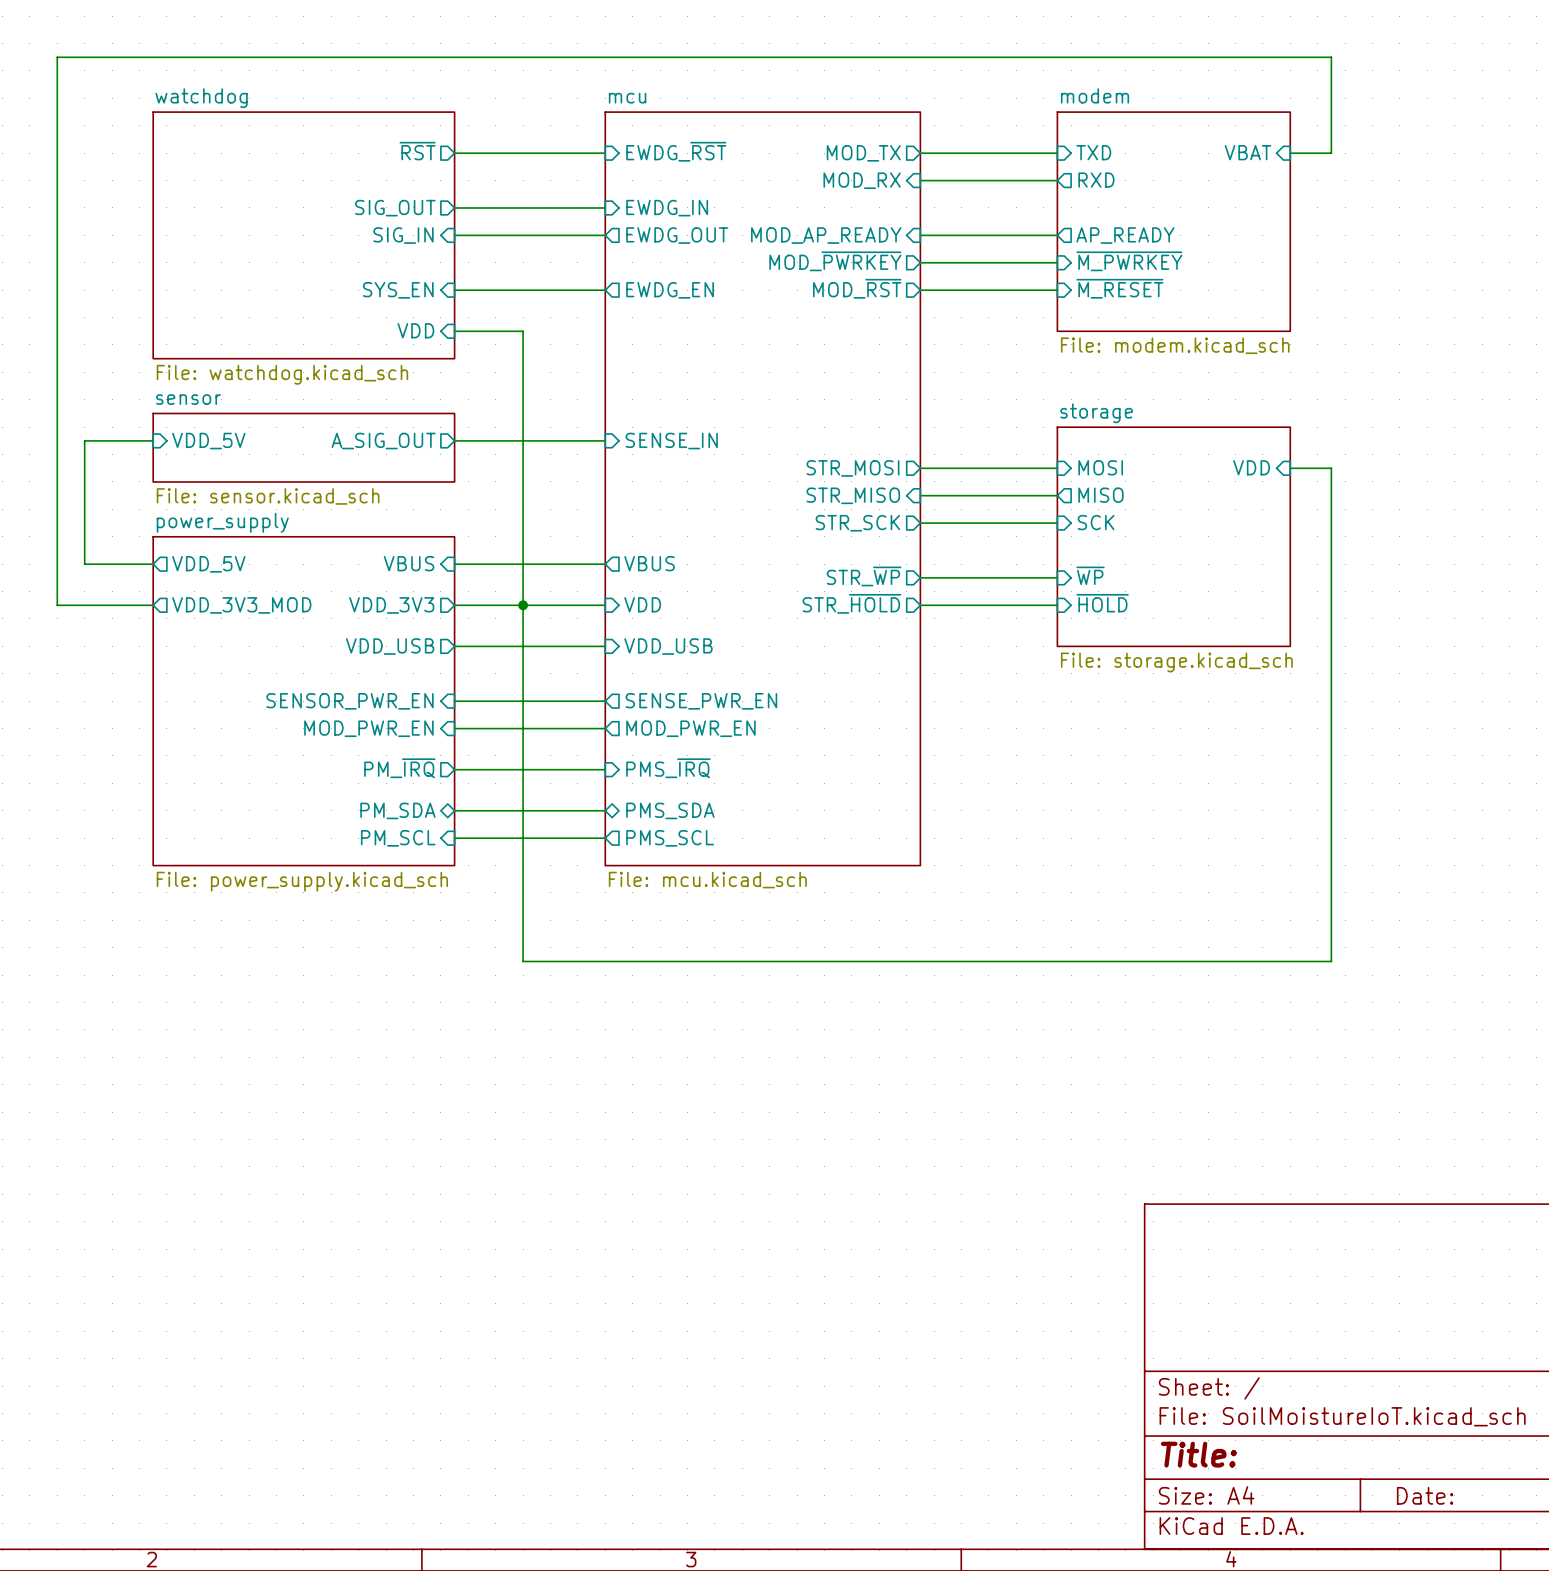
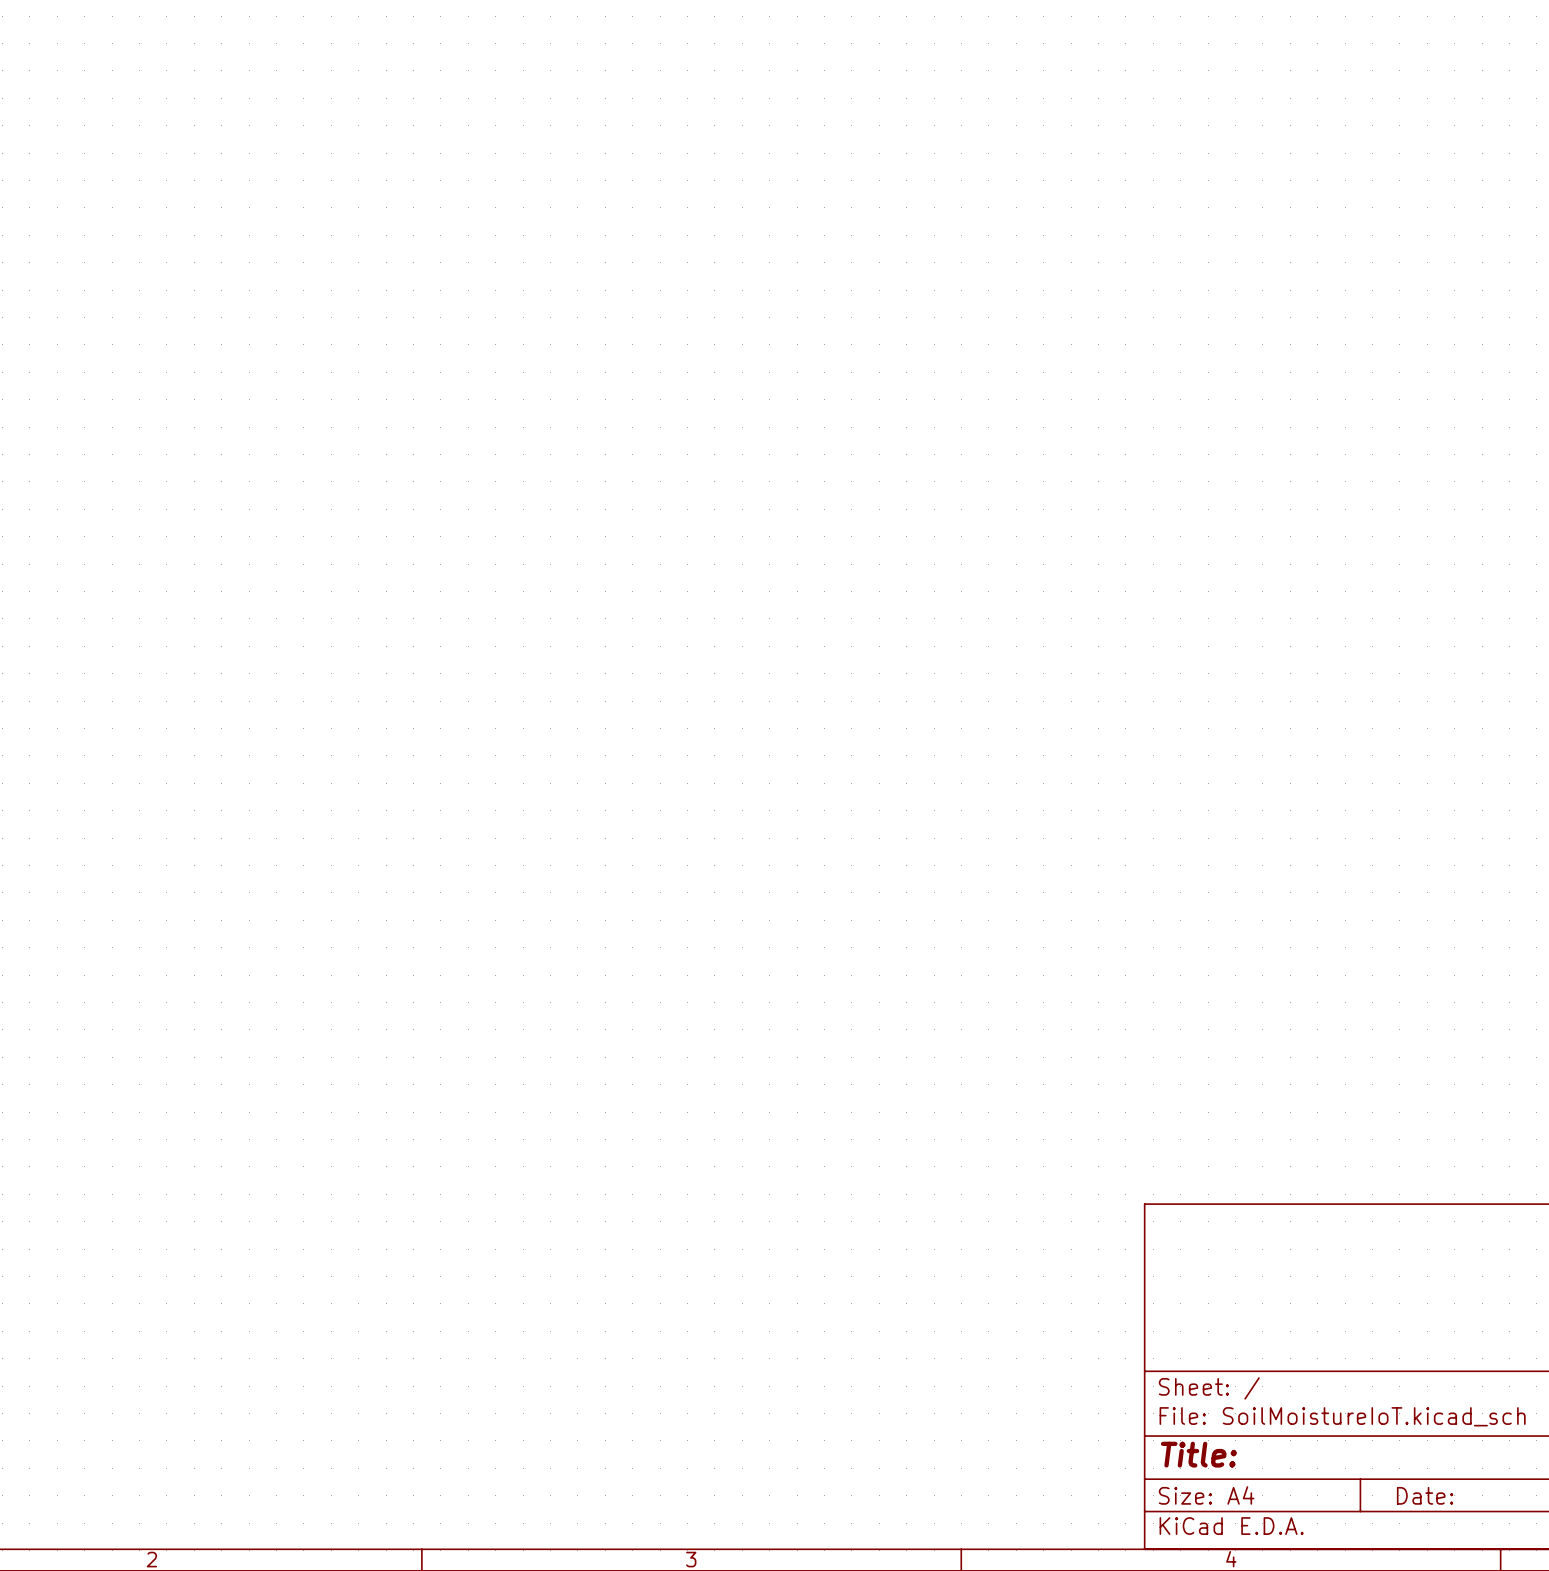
sheet pin: ~{RST} (417, 151) -> none
sheet pin: EWDG_~{RST} (676, 151) -> none
sheet pin: TXD (1093, 152) -> none
sheet pin: VBAT (1248, 152) -> none
wire: (454, 153) (605, 153) -> none
sheet pin: MOD_TX (863, 153) -> none
wire: (920, 153) (1057, 153) -> none
wire: (1290, 153) (1331, 153) (1331, 57) (57, 57) (57, 605) (153, 605) -> none
sheet pin: MOD_RX (862, 180) -> none
wire: (920, 180) (1057, 180) -> none
sheet pin: RXD (1096, 180) -> none
wire: (454, 207) (605, 207) -> none
sheet pin: SIG_OUT (395, 208) -> none
sheet pin: EWDG_IN (667, 208) -> none
sheet modem: File: modem.kicad_sch (1173, 221) -> none
sheet watchdog: File: watchdog.kicad_sch (303, 235) -> none
sheet pin: SIG_IN (403, 235) -> none
wire: (454, 235) (605, 235) -> none
sheet pin: EWDG_OUT (677, 235) -> none
sheet pin: MOD_AP_READY (826, 235) -> none
wire: (920, 235) (1057, 235) -> none
sheet pin: AP_READY (1125, 235) -> none
sheet pin: MOD_~{PWRKEY} (835, 261) -> none
sheet pin: ~{M_PWRKEY} (1129, 261) -> none
wire: (920, 262) (1057, 262) -> none
sheet pin: MOD_~{RST} (857, 288) -> none
sheet pin: ~{M_RESET} (1119, 288) -> none
sheet pin: SYS_EN (398, 290) -> none
wire: (454, 290) (605, 290) -> none
sheet pin: EWDG_EN (670, 290) -> none
wire: (920, 290) (1057, 290) -> none
sheet pin: VDD (415, 330) -> none
wire: (454, 331) (523, 331) (523, 961) (1331, 961) (1331, 468) (1290, 468) -> none
wire: (153, 440) (84, 440) (84, 564) (153, 564) -> none
wire: (454, 440) (605, 440) -> none
sheet pin: VDD_5V (208, 441) -> none
sheet pin: A_SIG_OUT (383, 441) -> none
sheet pin: SENSE_IN (671, 441) -> none
sheet sensor: File: sensor.kicad_sch (303, 447) -> none
sheet pin: MOSI (1100, 467) -> none
sheet pin: VDD (1251, 467) -> none
sheet pin: STR_MOSI (852, 468) -> none
wire: (920, 468) (1057, 468) -> none
sheet mcu: File: mcu.kicad_sch (762, 488) -> none
sheet pin: STR_MISO (853, 495) -> none
wire: (920, 495) (1057, 495) -> none
sheet pin: MISO (1100, 495) -> none
sheet pin: SCK (1096, 522) -> none
sheet pin: STR_SCK (857, 523) -> none
wire: (920, 523) (1057, 523) -> none
sheet storage: File: storage.kicad_sch (1173, 536) -> none
sheet pin: VBUS (409, 563) -> none
sheet pin: VBUS (649, 563) -> none
sheet pin: VDD_5V (208, 564) -> none
wire: (454, 564) (605, 564) -> none
sheet pin: ~{WP} (1090, 575) -> none
sheet pin: STR_~{WP} (864, 576) -> none
wire: (920, 577) (1057, 577) -> none
sheet pin: STR_~{HOLD} (851, 603) -> none
sheet pin: ~{HOLD} (1102, 603) -> none
sheet pin: VDD (642, 604) -> none
sheet pin: VDD_3V3_MOD (241, 605) -> none
sheet pin: VDD_3V3 (391, 605) -> none
wire: (454, 605) (605, 605) -> none
junction: (523, 605) -> none
wire: (920, 605) (1057, 605) -> none
sheet pin: VDD_USB (390, 646) -> none
wire: (454, 646) (605, 646) -> none
sheet pin: VDD_USB (668, 646) -> none
sheet power_supply: File: power_supply.kicad_sch (303, 701) -> none
sheet pin: SENSOR_PWR_EN (349, 701) -> none
wire: (454, 701) (605, 701) -> none
sheet pin: SENSE_PWR_EN (701, 701) -> none
sheet pin: MOD_PWR_EN (368, 728) -> none
wire: (454, 728) (605, 728) -> none
sheet pin: MOD_PWR_EN (690, 728) -> none
sheet pin: PM_~{IRQ} (399, 768) -> none
sheet pin: PMS_~{IRQ} (668, 768) -> none
wire: (454, 769) (605, 769) -> none
sheet pin: PM_SDA (397, 810) -> none
wire: (454, 810) (605, 810) -> none
sheet pin: PMS_SDA (670, 810) -> none
sheet pin: PM_SCL (398, 838) -> none
wire: (454, 838) (605, 838) -> none
sheet pin: PMS_SCL (670, 838) -> none

